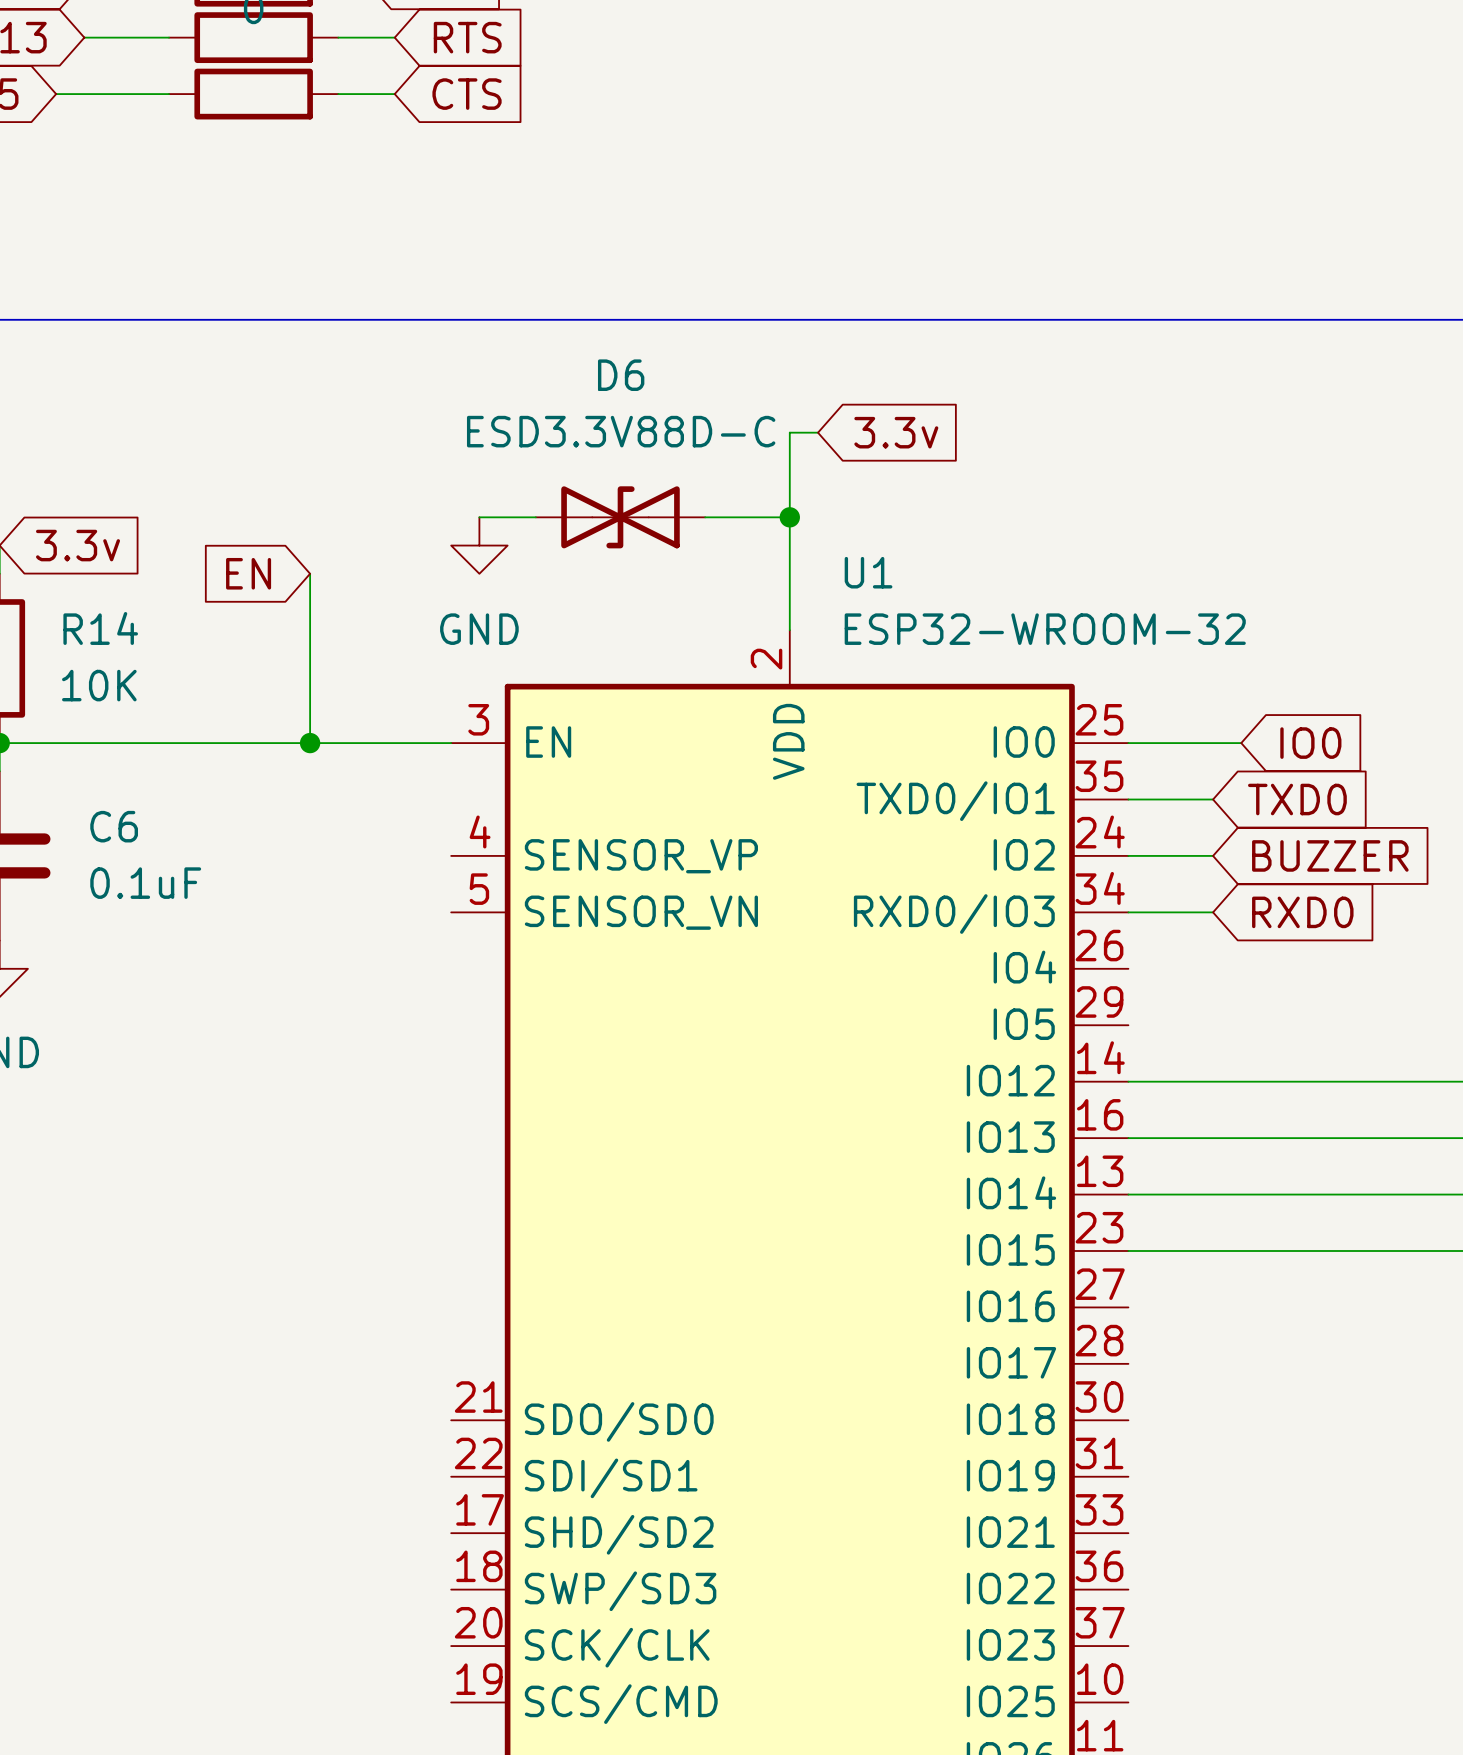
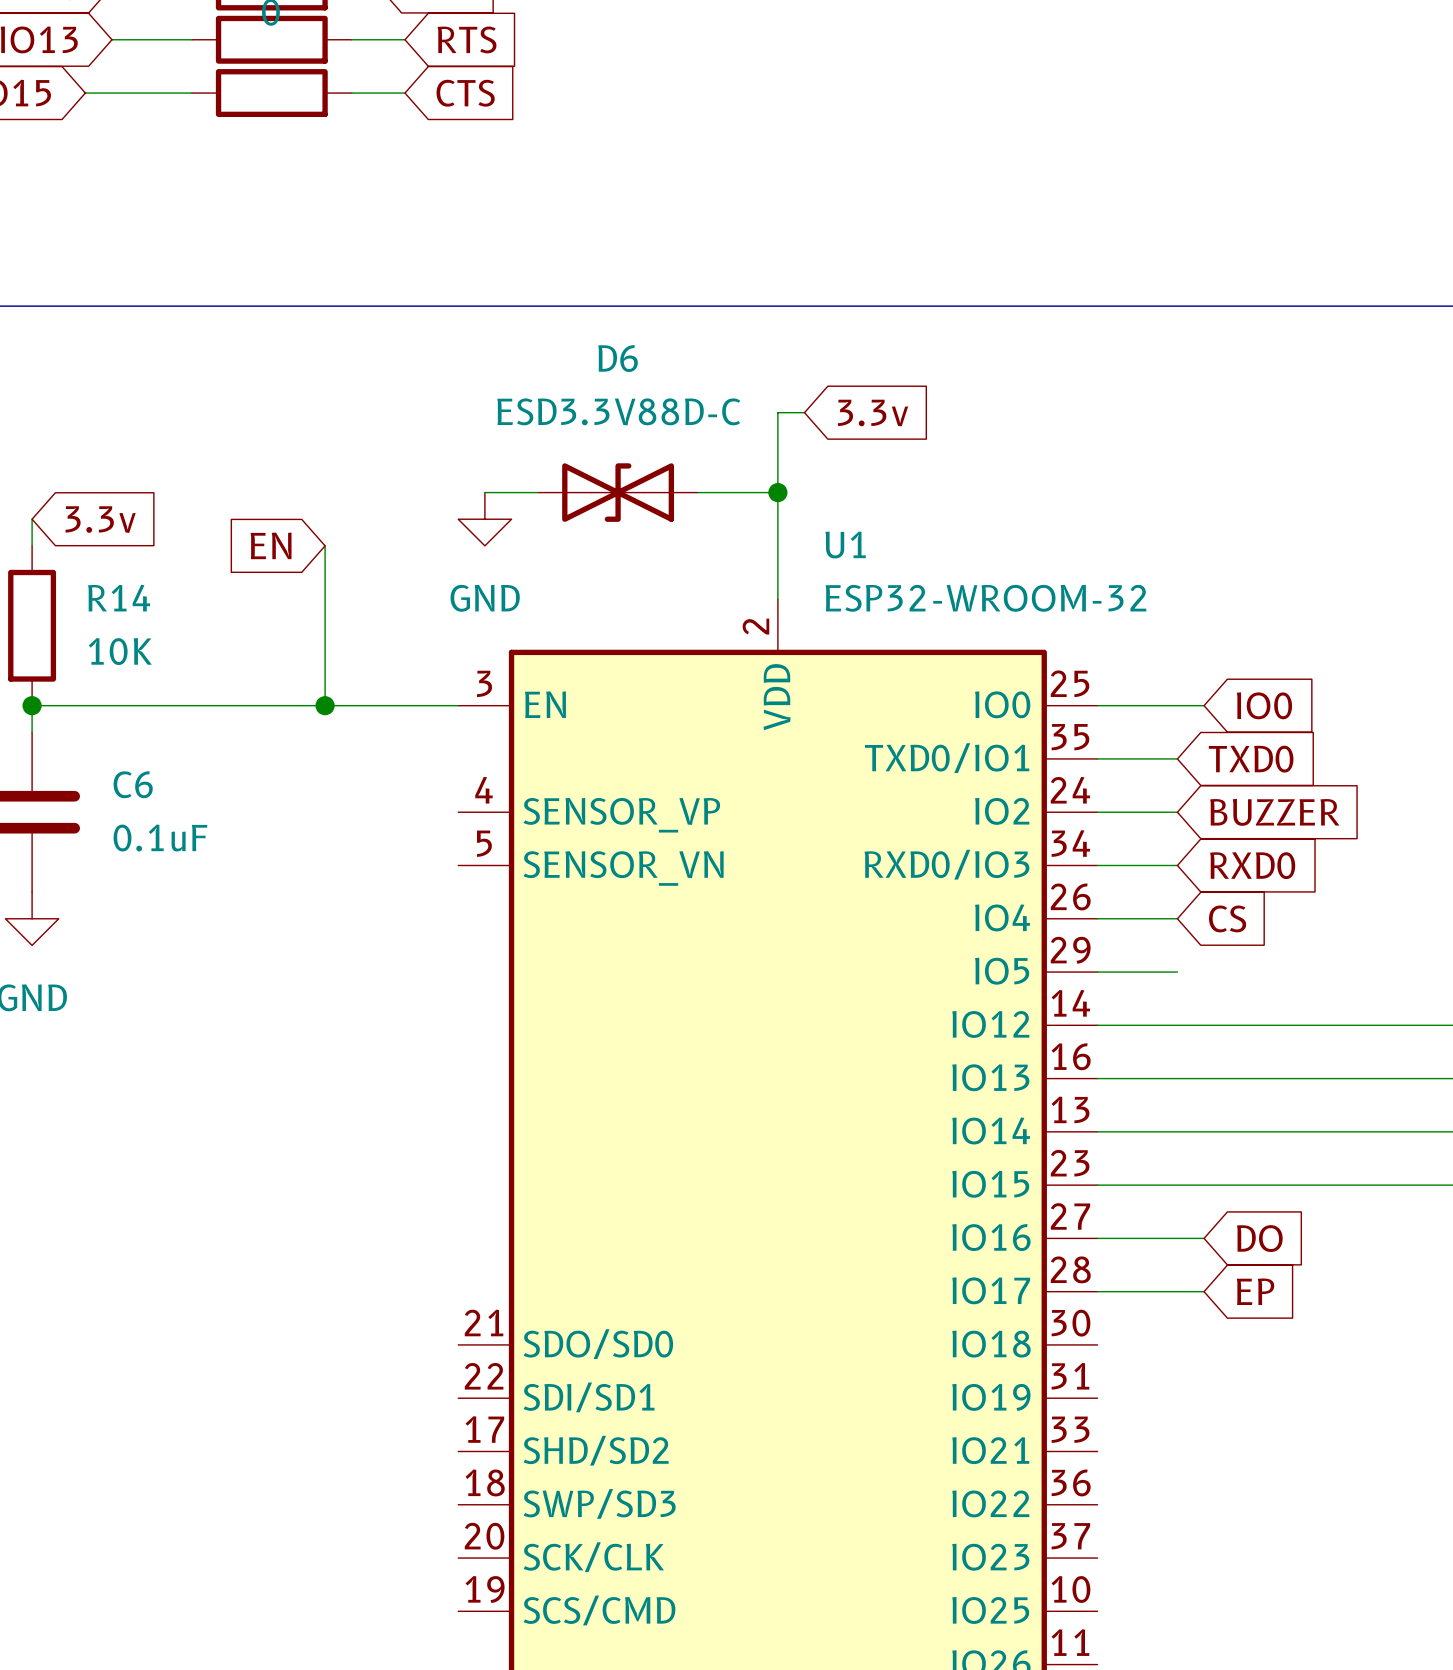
wire: none -> (1097, 918) (1177, 918)
global label: none -> CS (1227, 918)
wire: none -> (1097, 972) (1177, 972)
wire: none -> (1097, 1238) (1204, 1238)
global label: none -> DO (1259, 1238)
wire: none -> (1097, 1291) (1204, 1291)
global label: none -> EP (1255, 1291)

